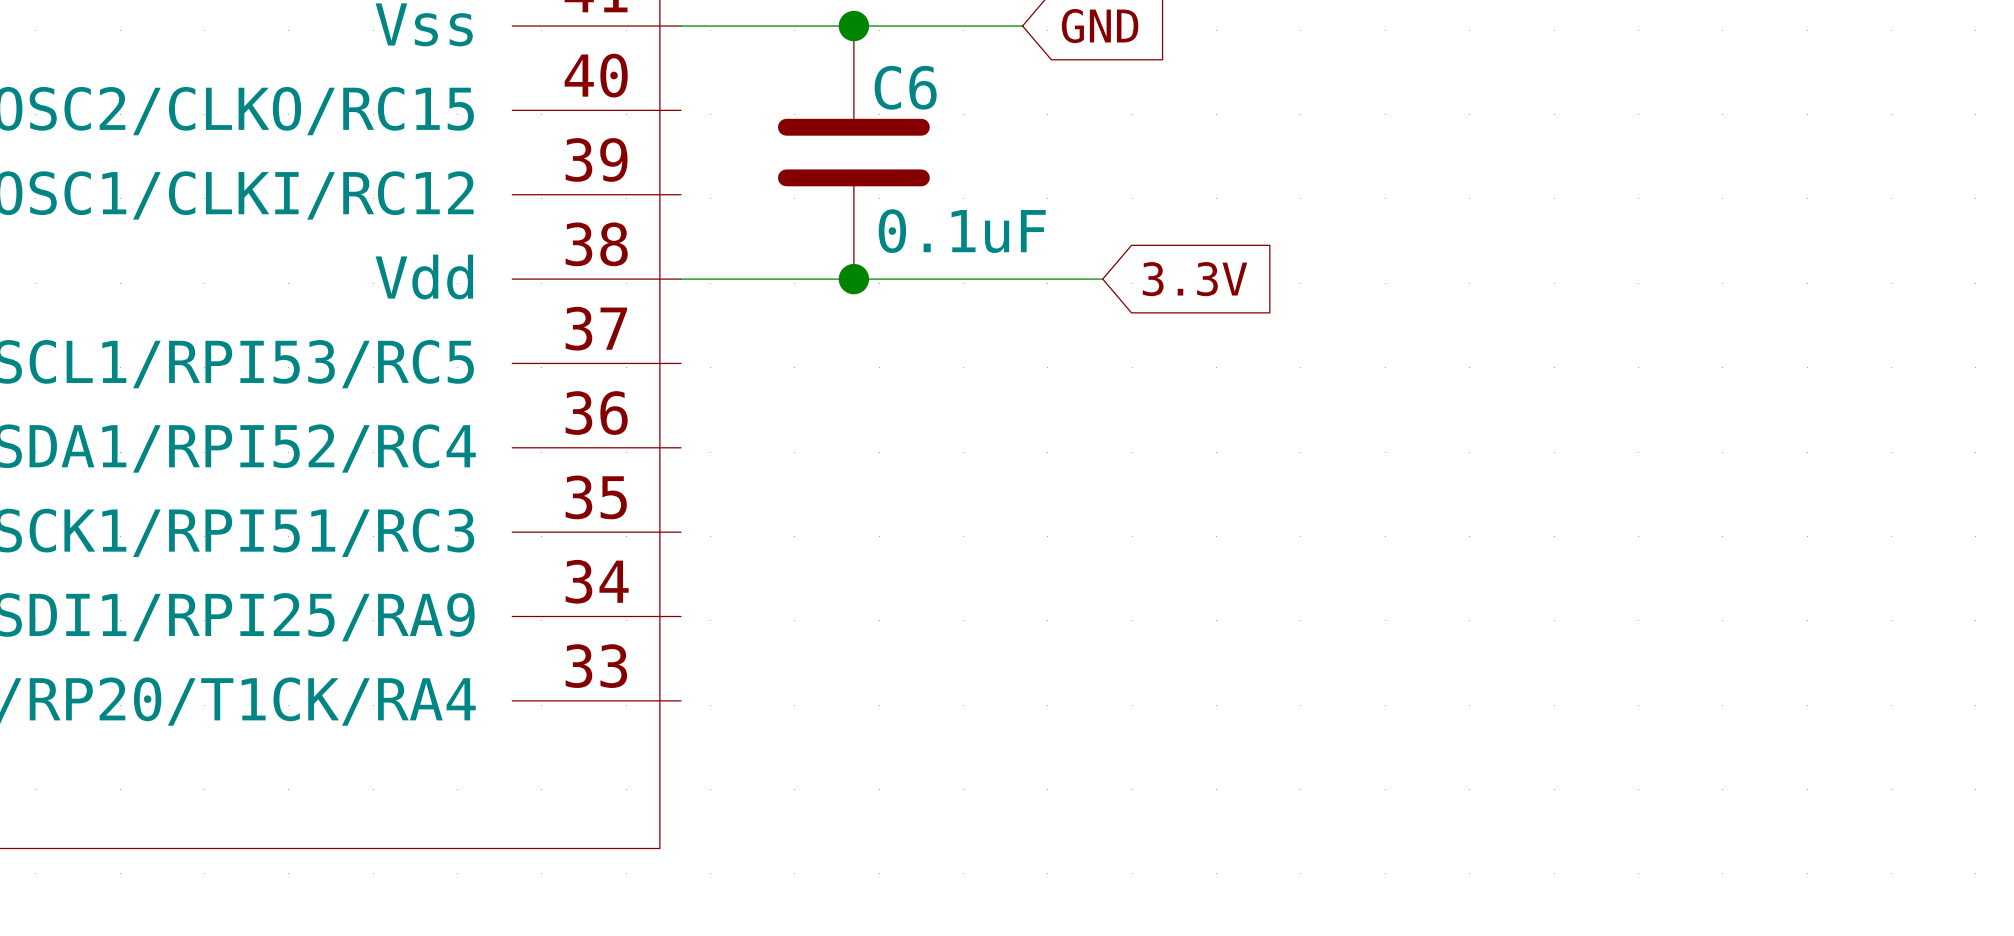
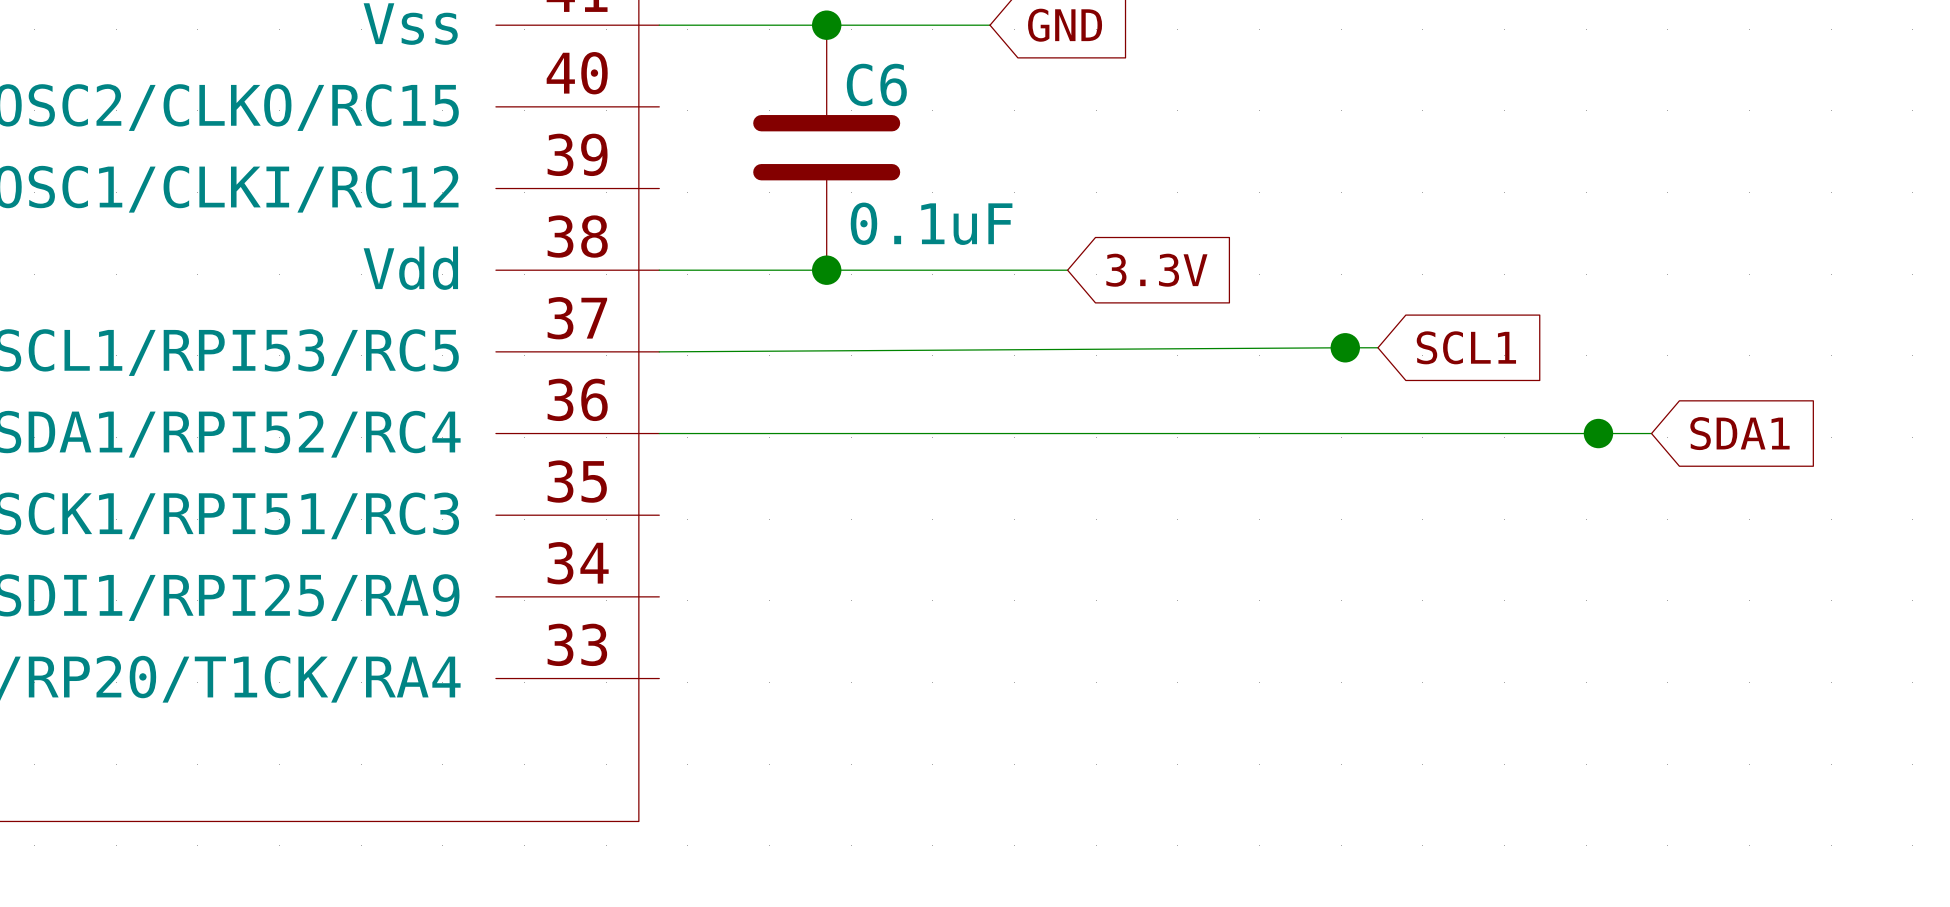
junction: none -> (1345, 347)
wire: none -> (1377, 347) (659, 351)
global label: none -> SCL1 (1466, 347)
wire: none -> (659, 433) (1651, 433)
junction: none -> (1598, 433)
global label: none -> SDA1 (1739, 433)

